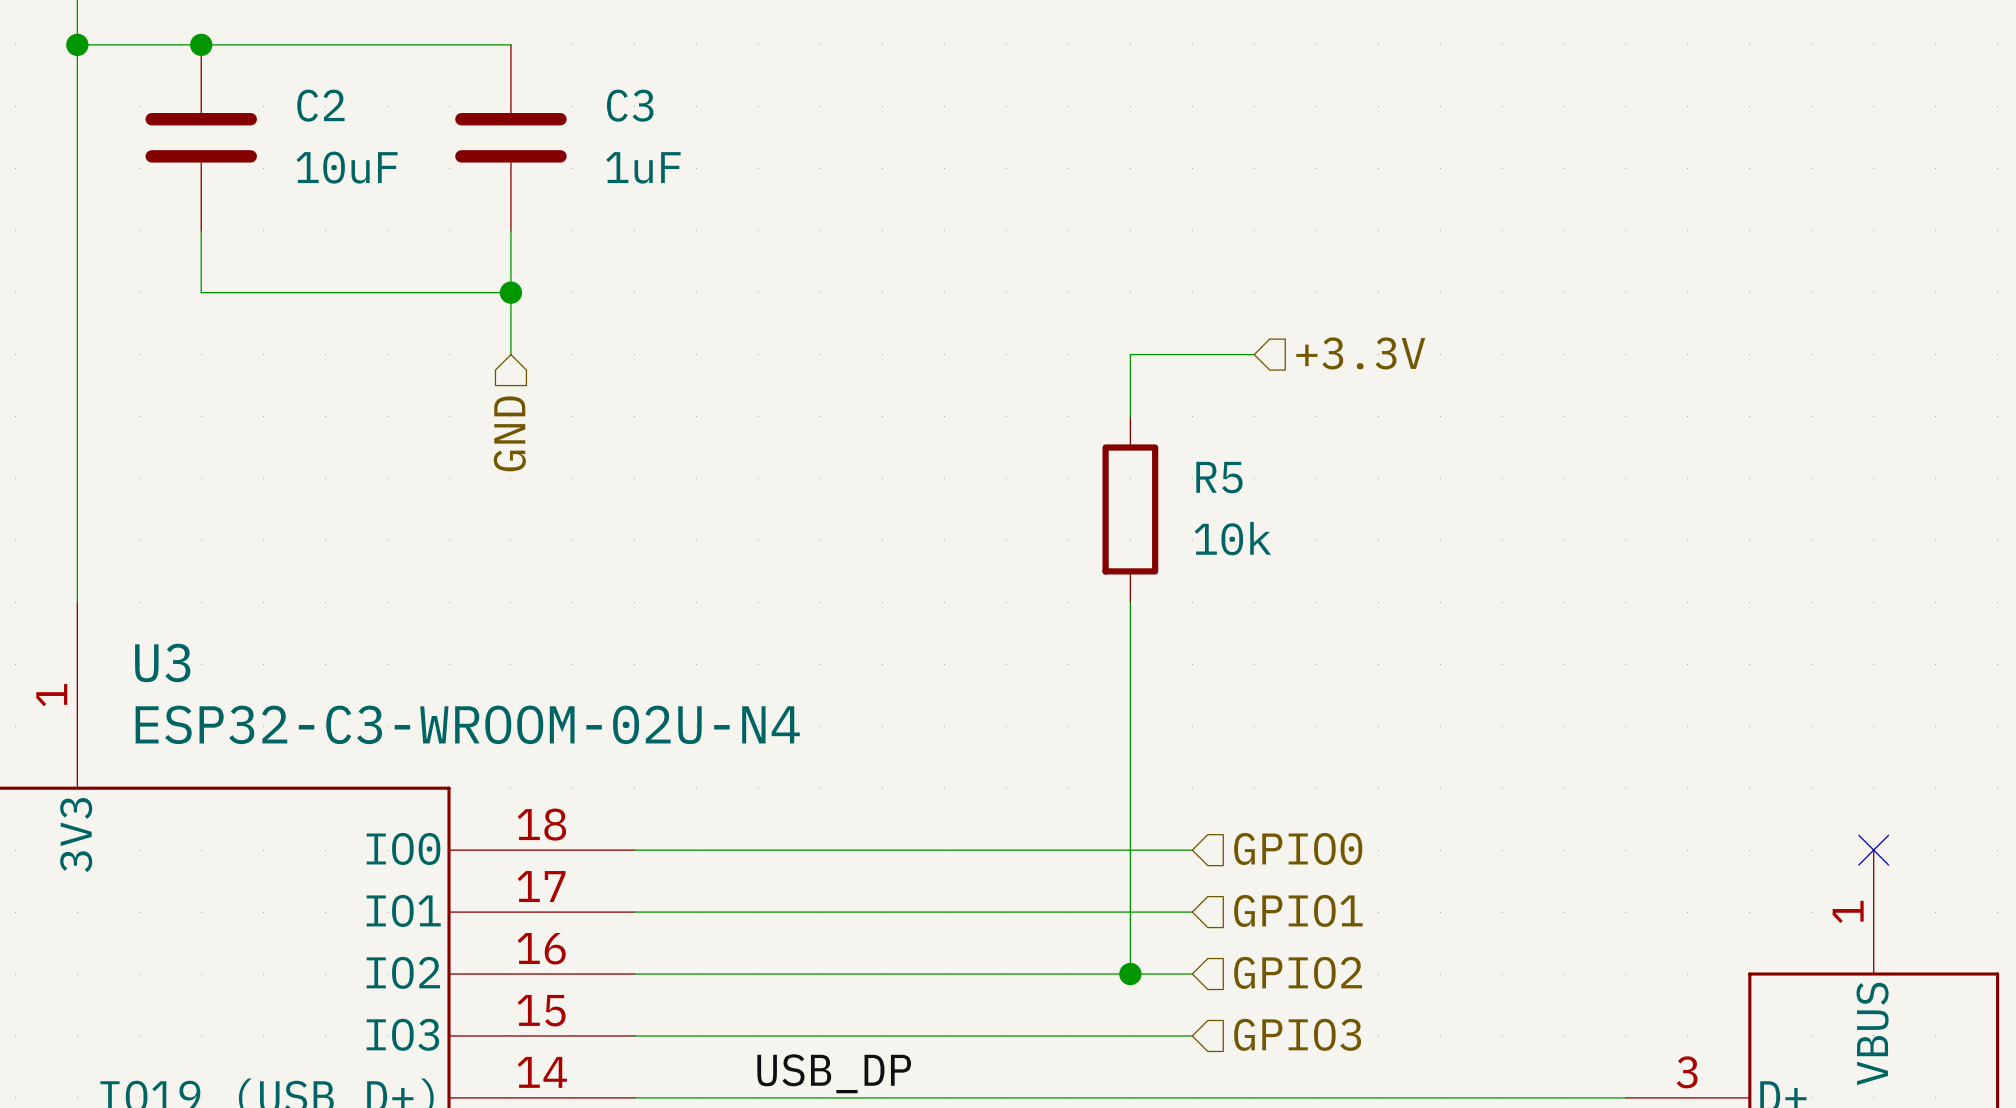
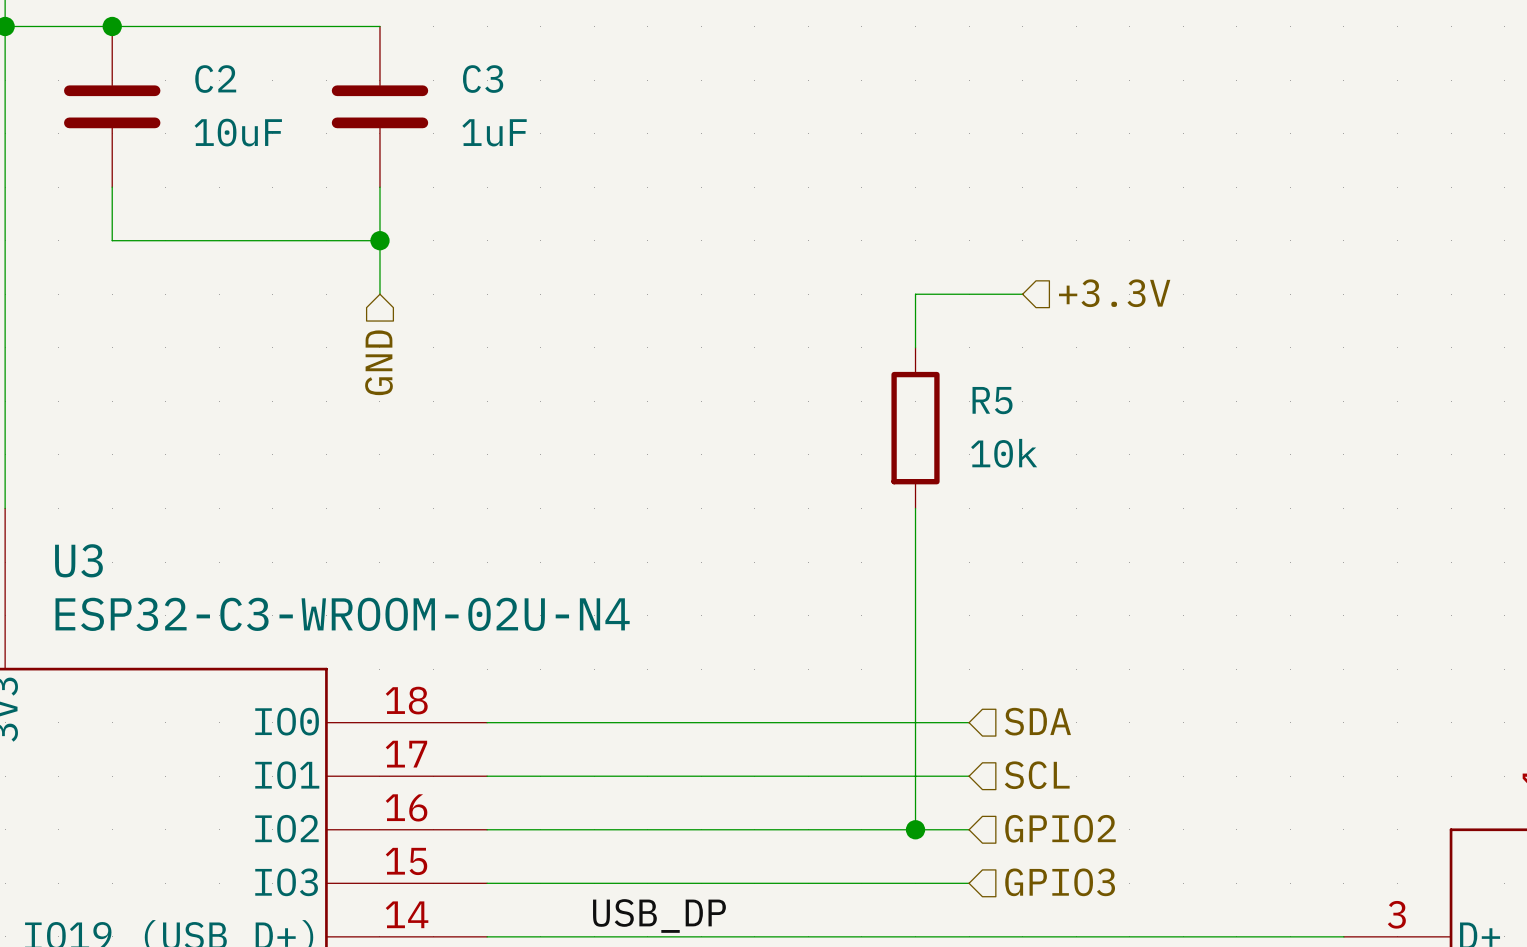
hierarchical label: GPIO0 (1298, 848) -> SDA (1037, 721)
hierarchical label: GPIO1 (1298, 910) -> SCL (1037, 775)

